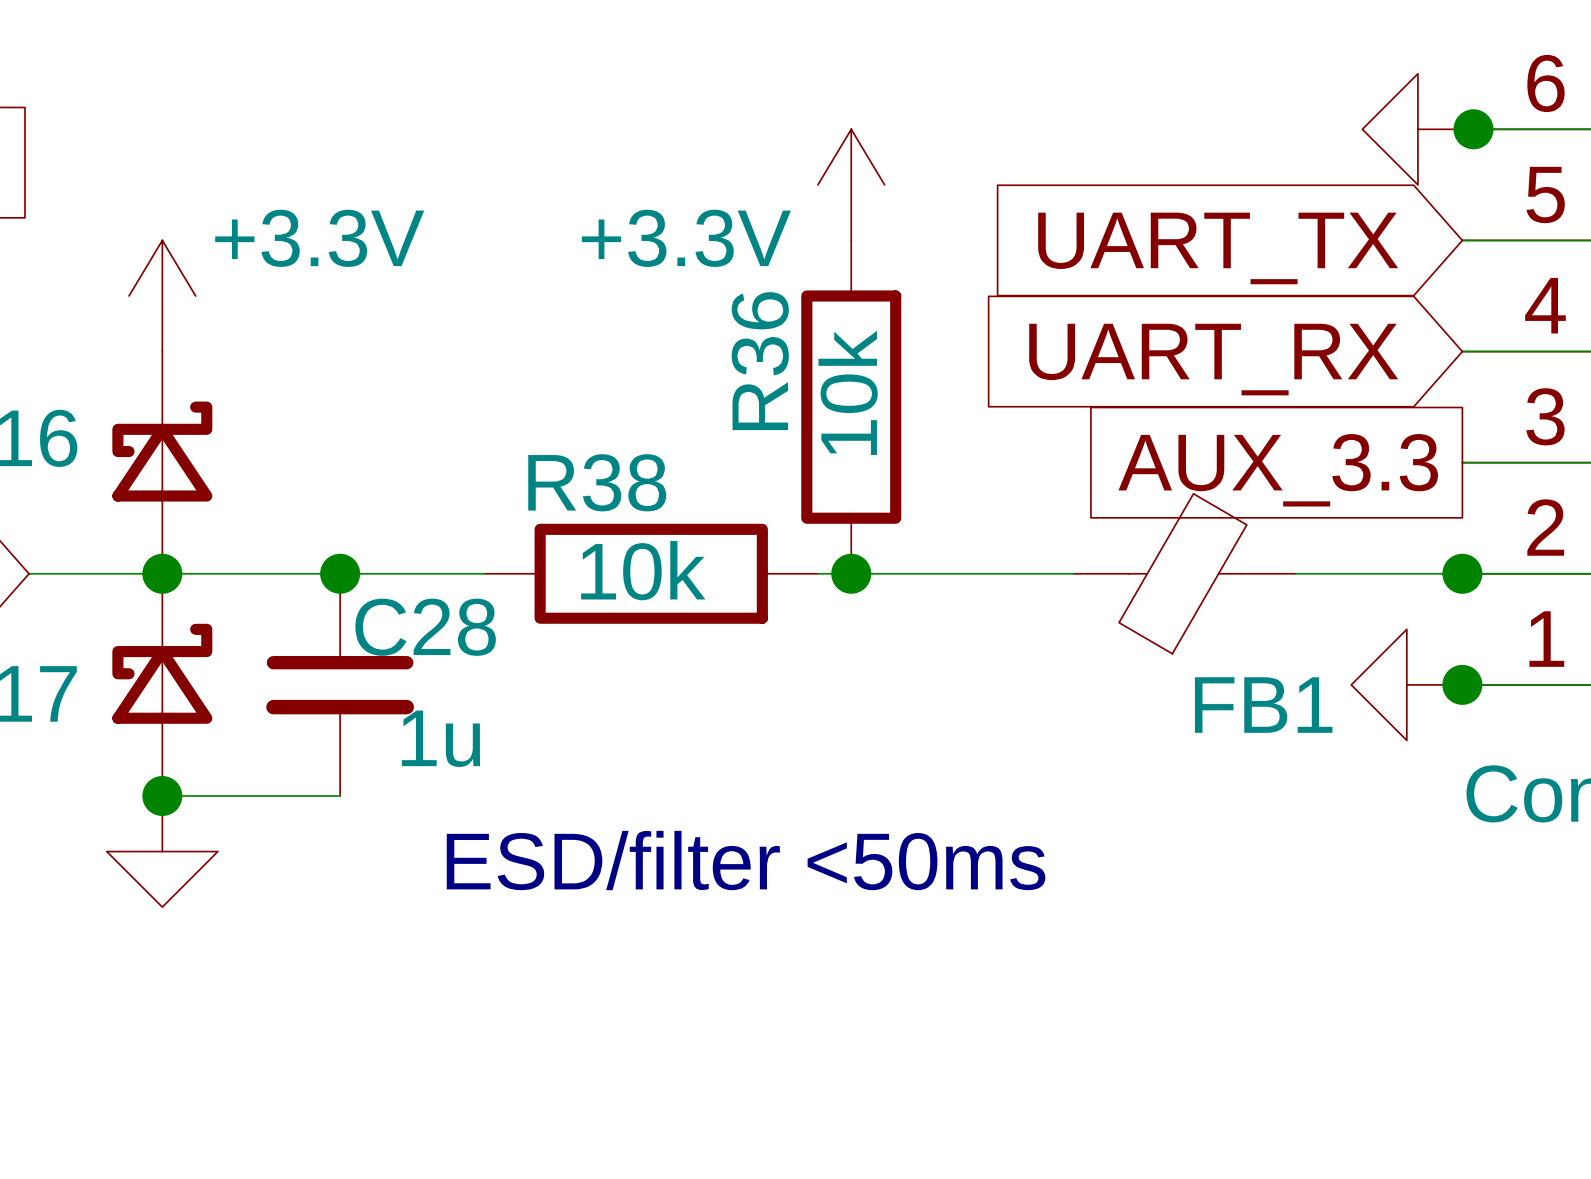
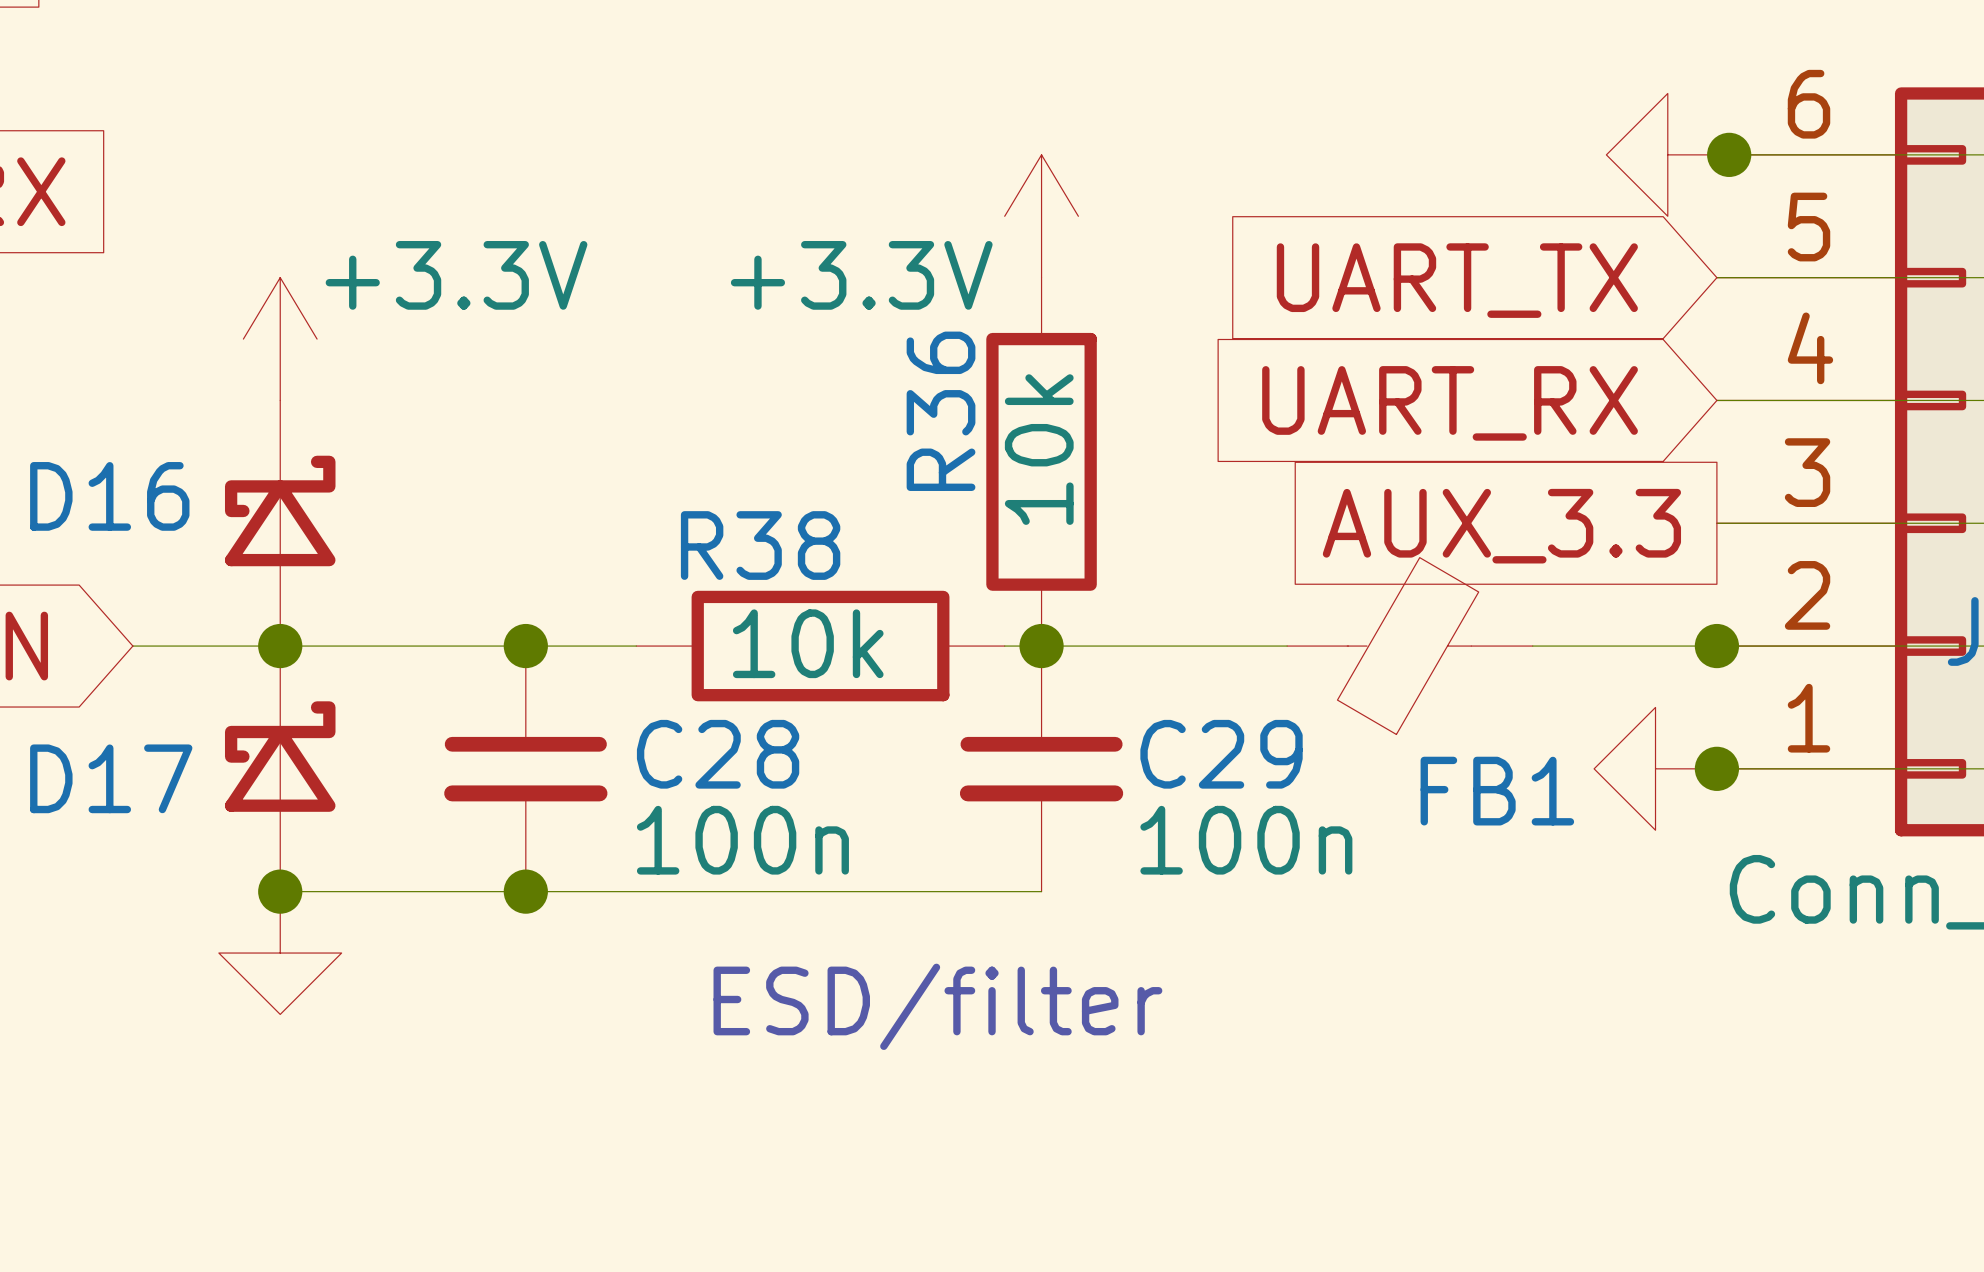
junction position: (340, 573) -> (525, 646)
C28 name position: C28 (425, 627) -> C28 (718, 754)
C28 position: (340, 684) -> (525, 768)
C29: none -> 100n (1041, 768)
C28 value: 1u (440, 738) -> 100n (742, 840)
wire: none -> (476, 891) (1041, 891)
junction: none -> (525, 891)
text: ESD/filter <50ms (746, 860) -> ESD/filter (937, 1006)

